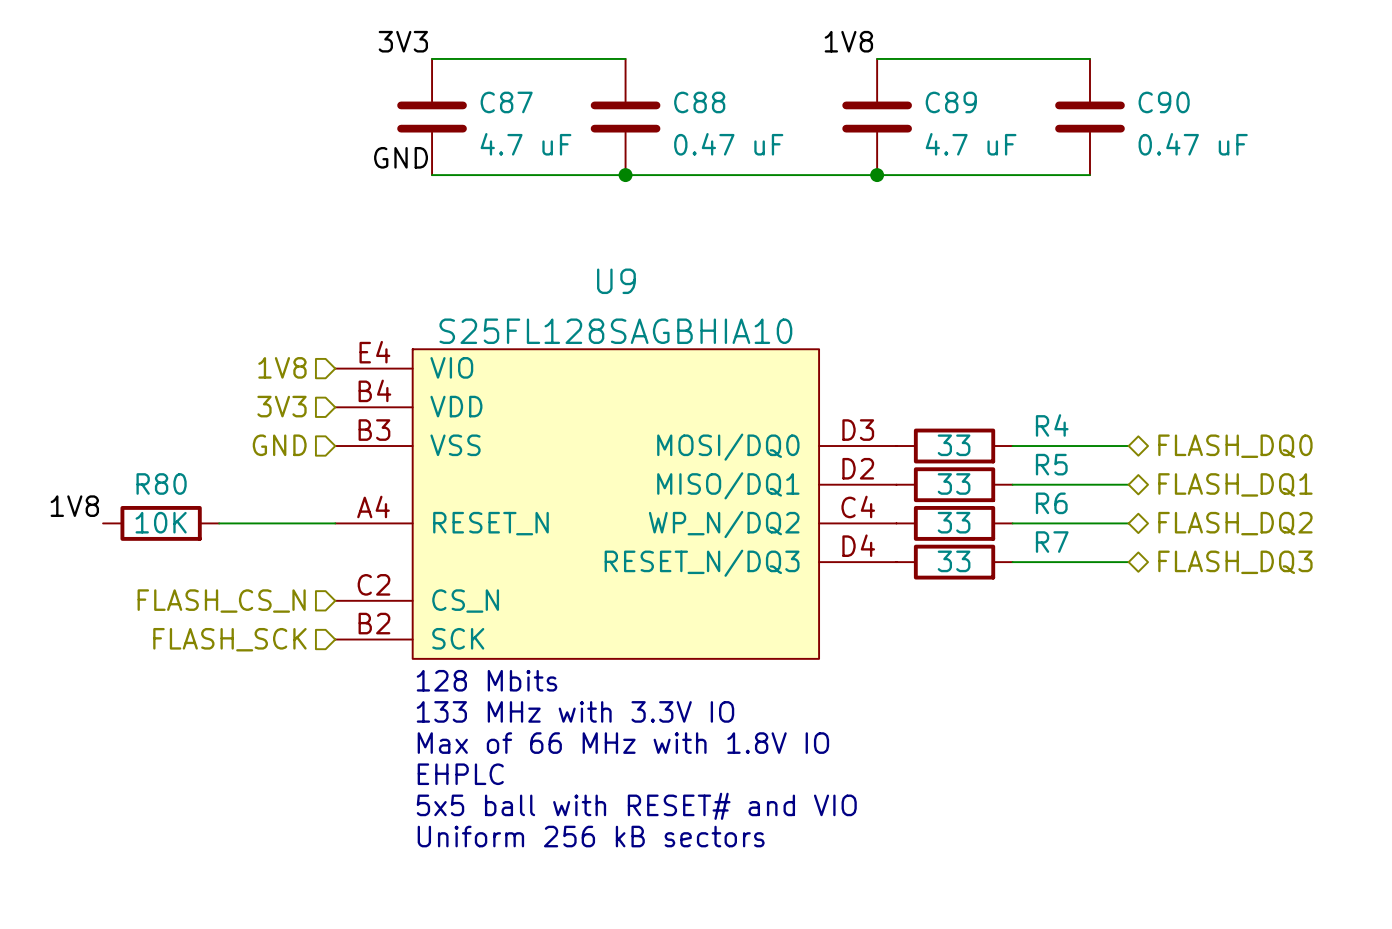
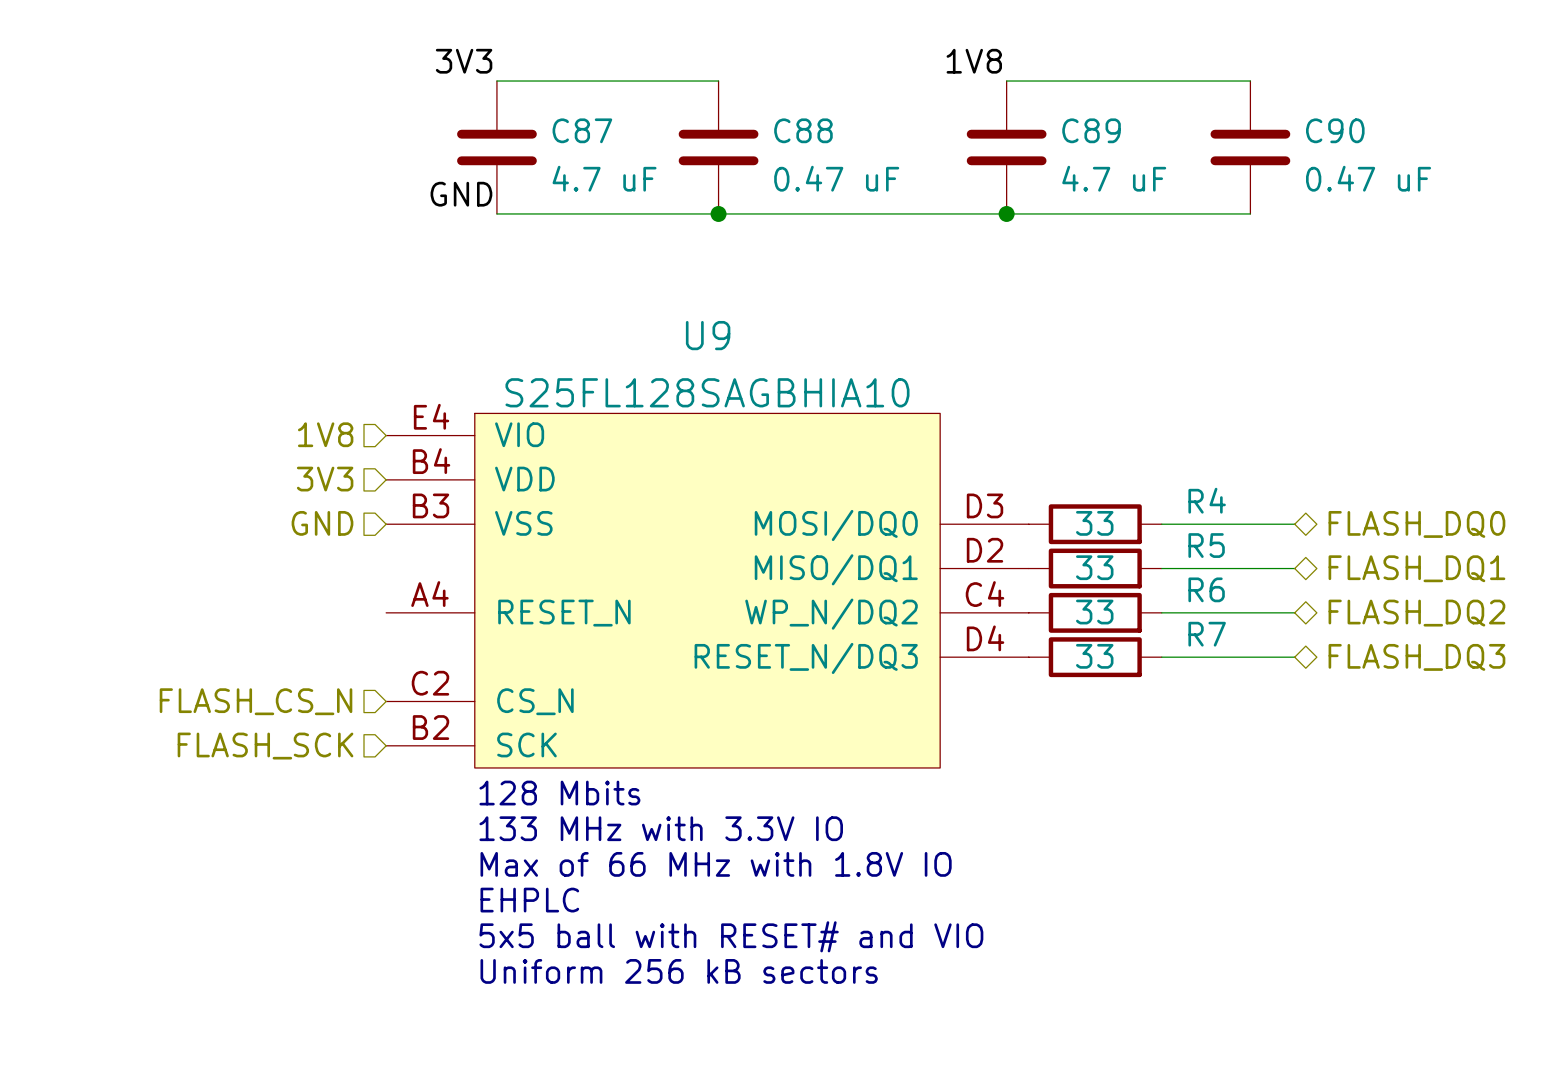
label: 1V8 (74, 506) -> none
R80: 10K (161, 523) -> none
wire: (219, 523) (335, 523) -> none

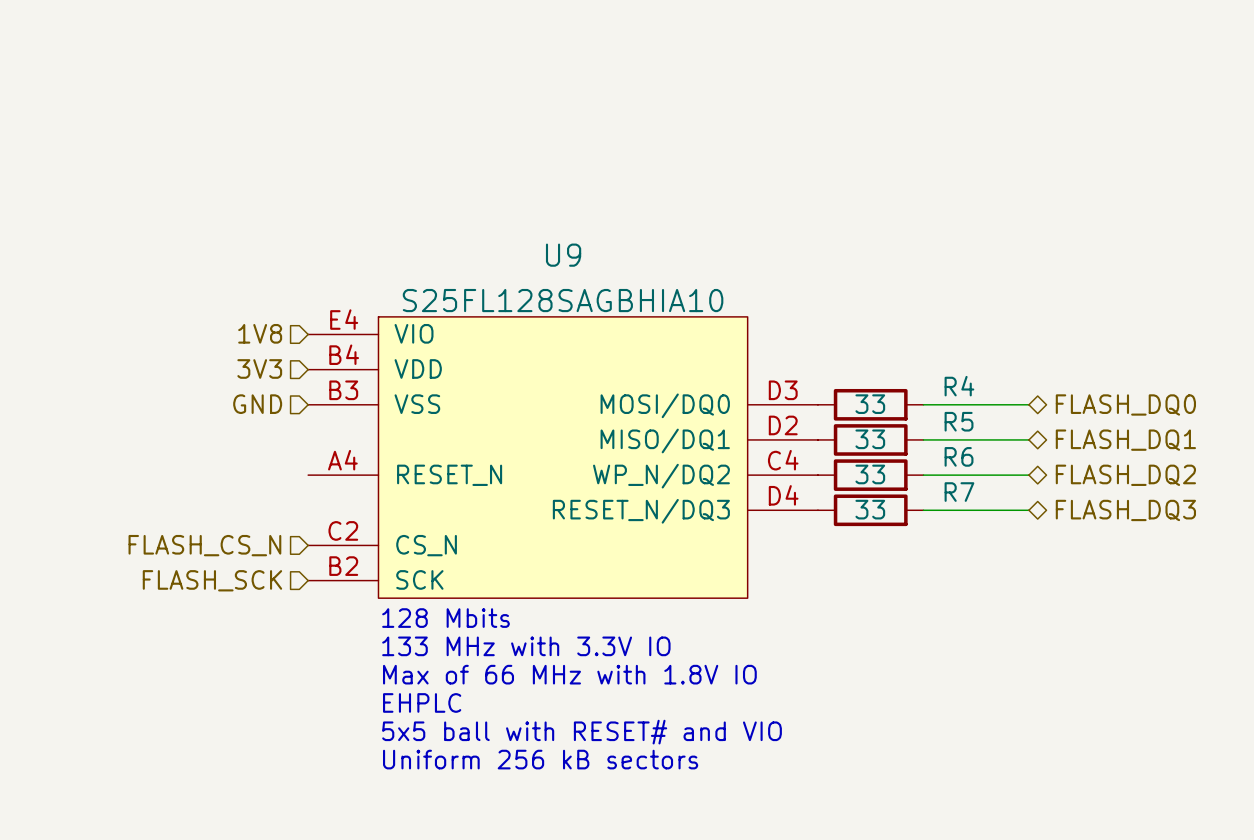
label: 3V3 (464, 61) -> none
label: 1V8 (974, 61) -> none
wire: (496, 81) (718, 81) -> none
wire: (1006, 81) (1250, 81) -> none
C87: 4.7 uF (496, 147) -> none
C88: 0.47 uF (718, 147) -> none
C89: 4.7 uF (1006, 147) -> none
C90: 0.47 uF (1250, 147) -> none
label: GND (461, 194) -> none
wire: (496, 213) (1250, 213) -> none
junction: (718, 213) -> none
junction: (1006, 213) -> none

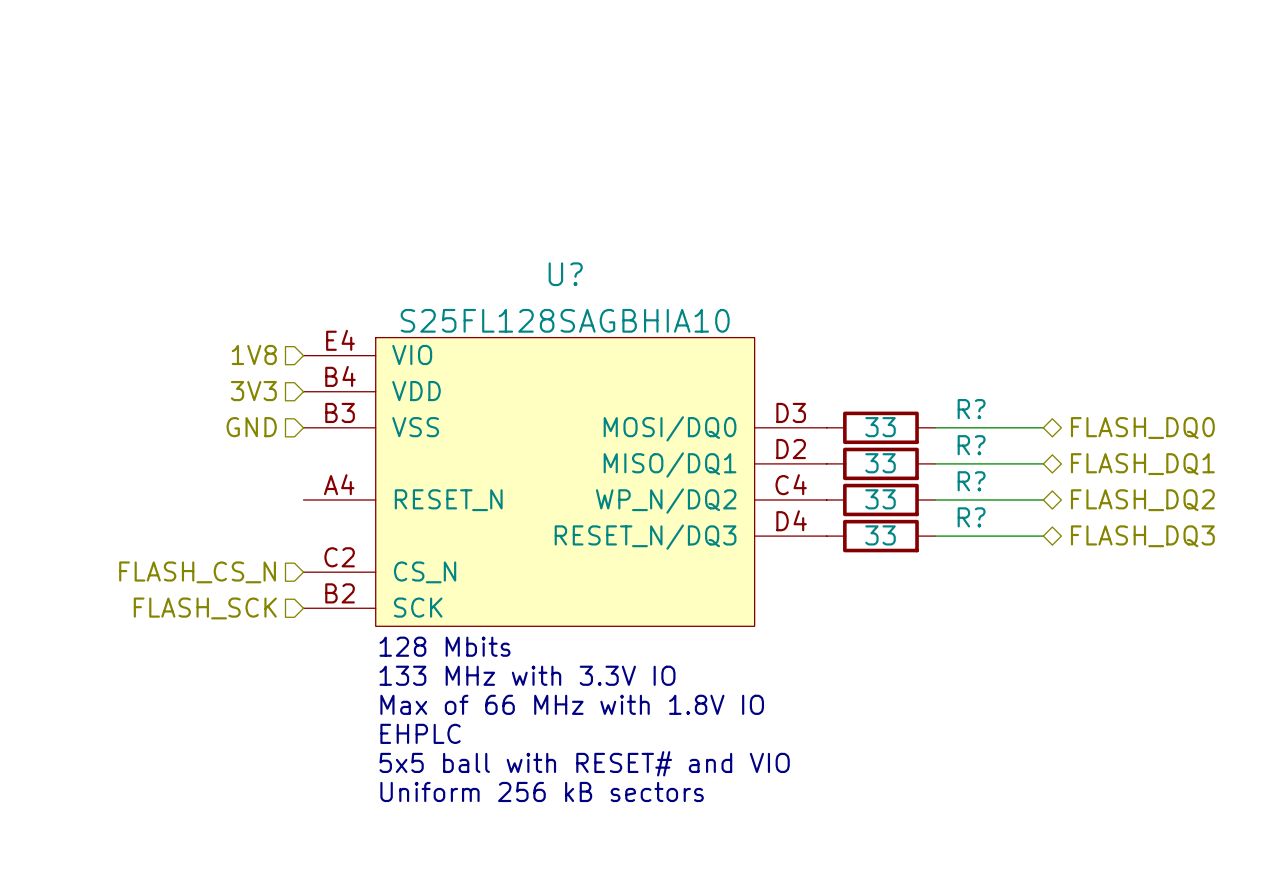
U9 name: U9 (563, 255) -> U? (565, 274)
R4 name: R4 (959, 386) -> R? (971, 409)
R5 name: R5 (959, 421) -> R? (971, 445)
R6 name: R6 (959, 456) -> R? (971, 481)
R7 name: R7 (959, 492) -> R? (971, 517)

